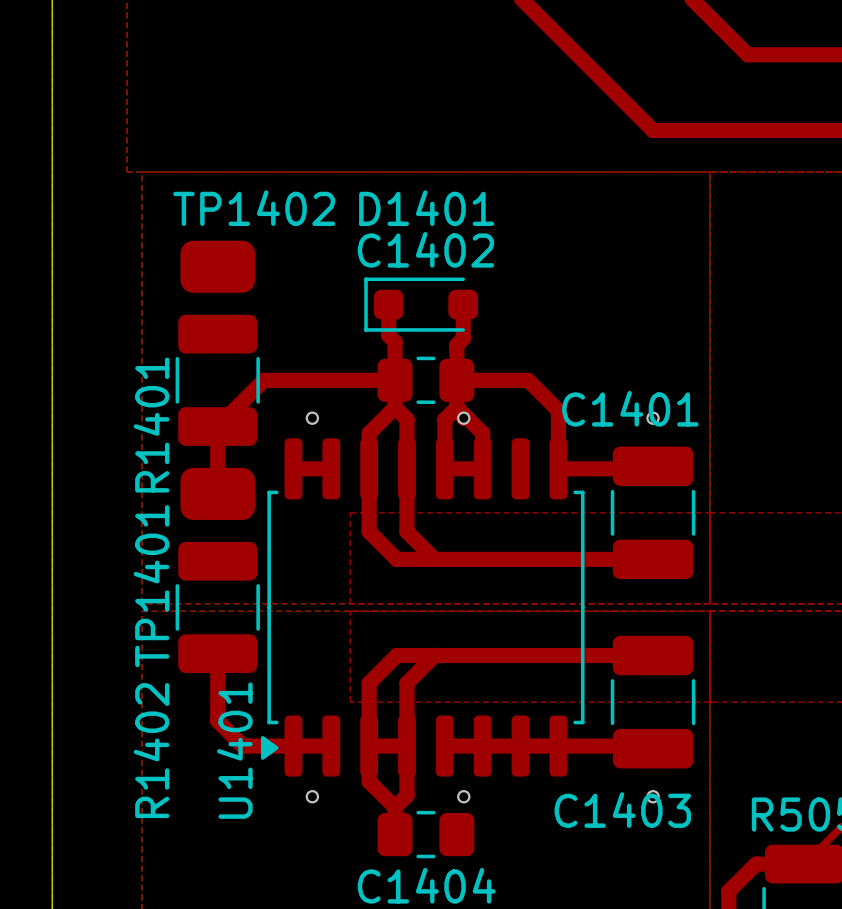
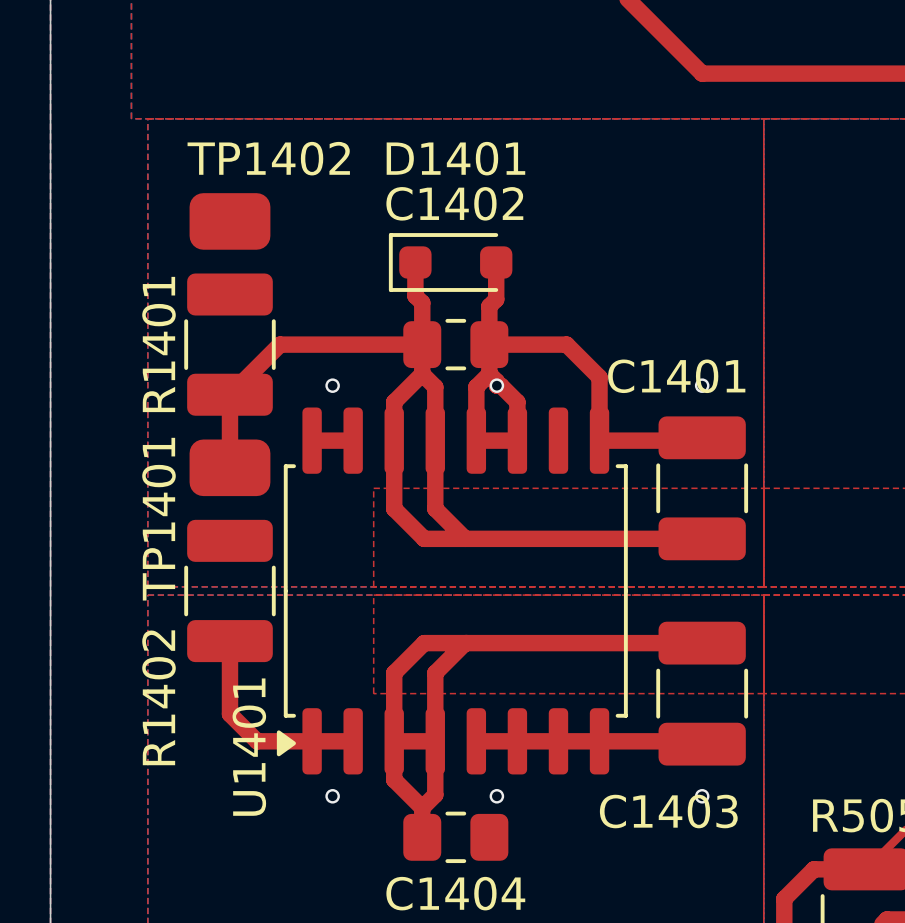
R1401 name position: R1401 (151, 425) -> R1401 (158, 344)
TP1401 name position: TP1401 (151, 586) -> TP1401 (158, 519)
R1402 name position: R1402 (151, 750) -> R1402 (158, 697)

